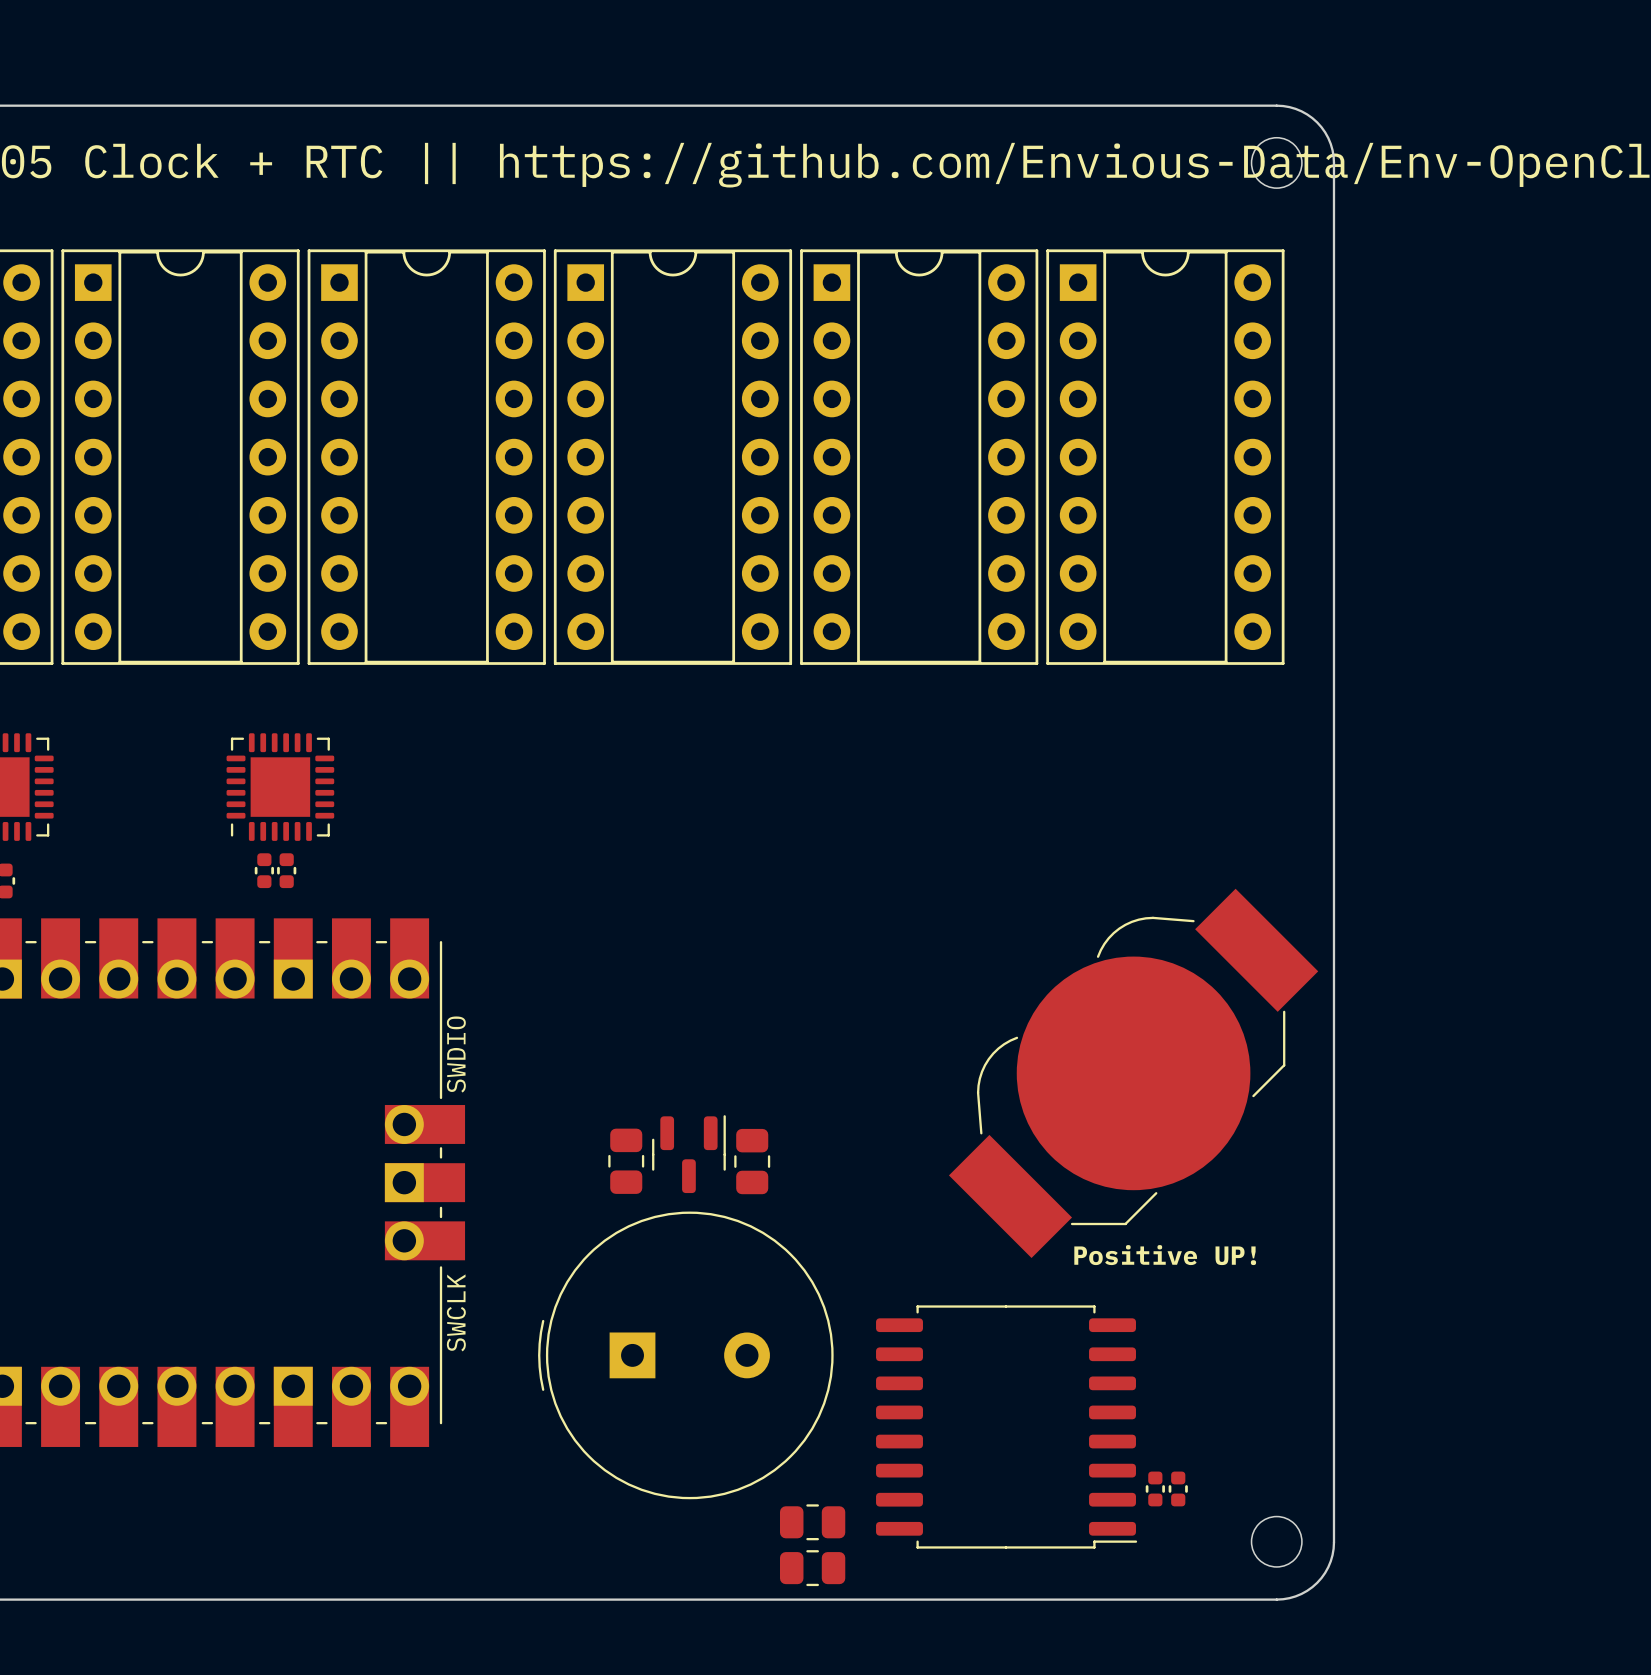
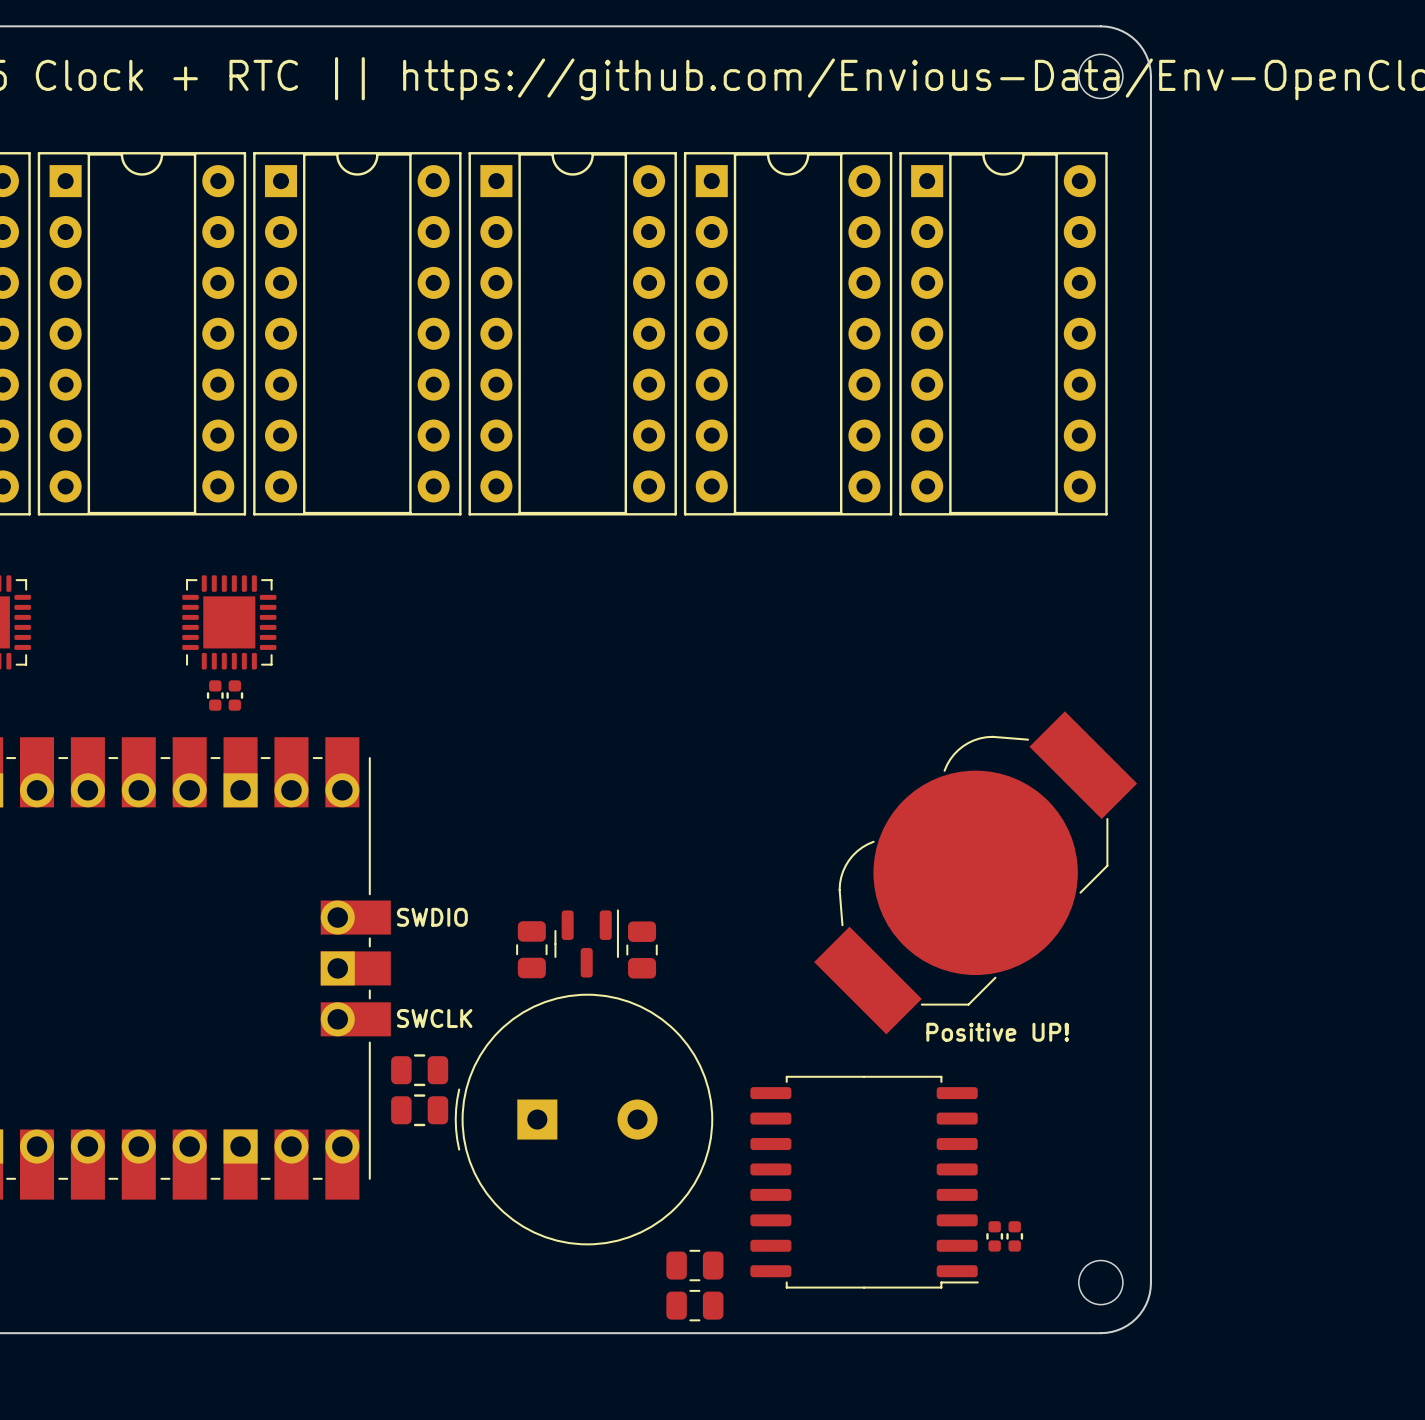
part text rotation: 0° (456, 1054) -> 90° clockwise (432, 917)
part: none -> (419, 1070)
part text rotation: 0° (456, 1312) -> 90° clockwise (434, 1018)
part: none -> (419, 1110)

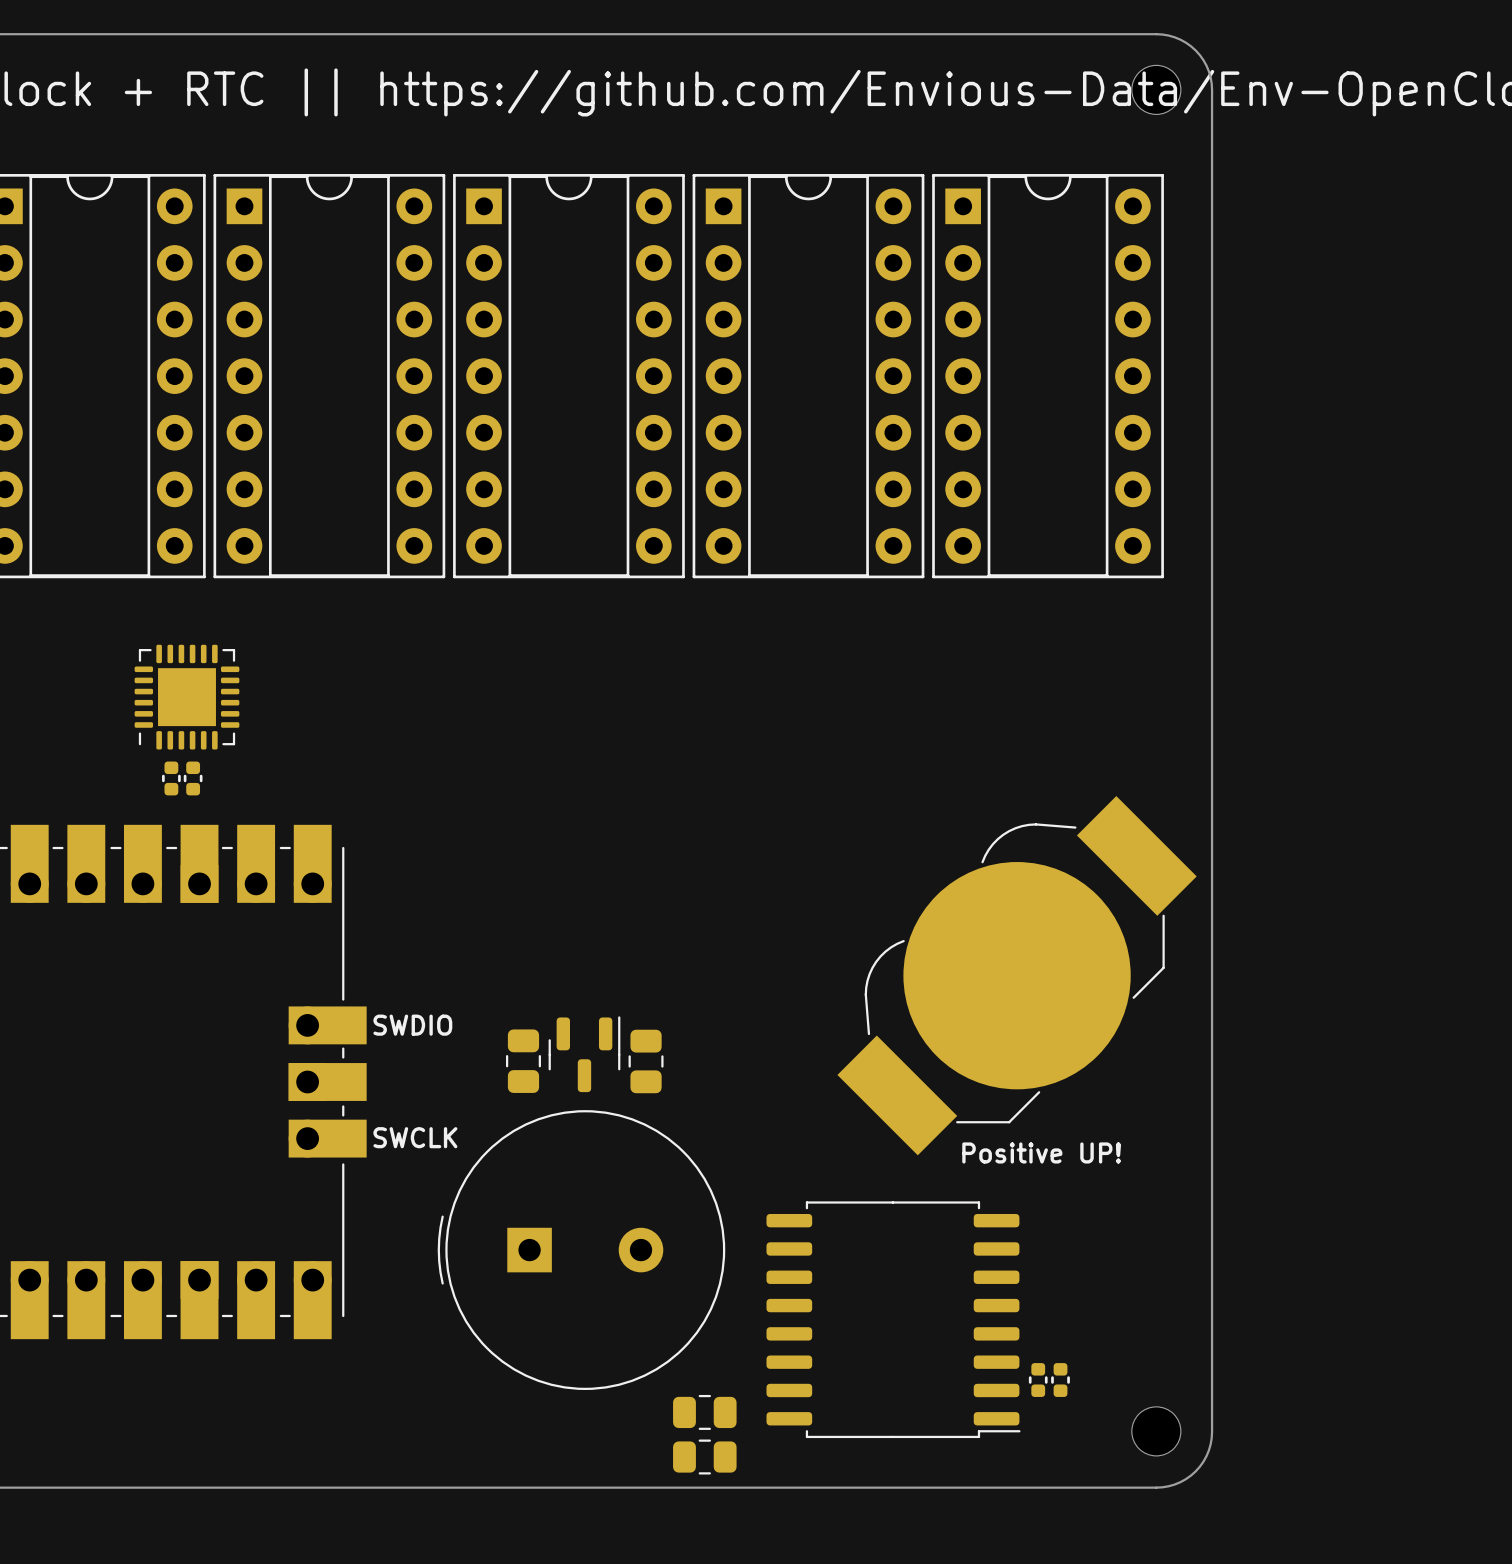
part: (419, 1070) -> none
part: (419, 1110) -> none

